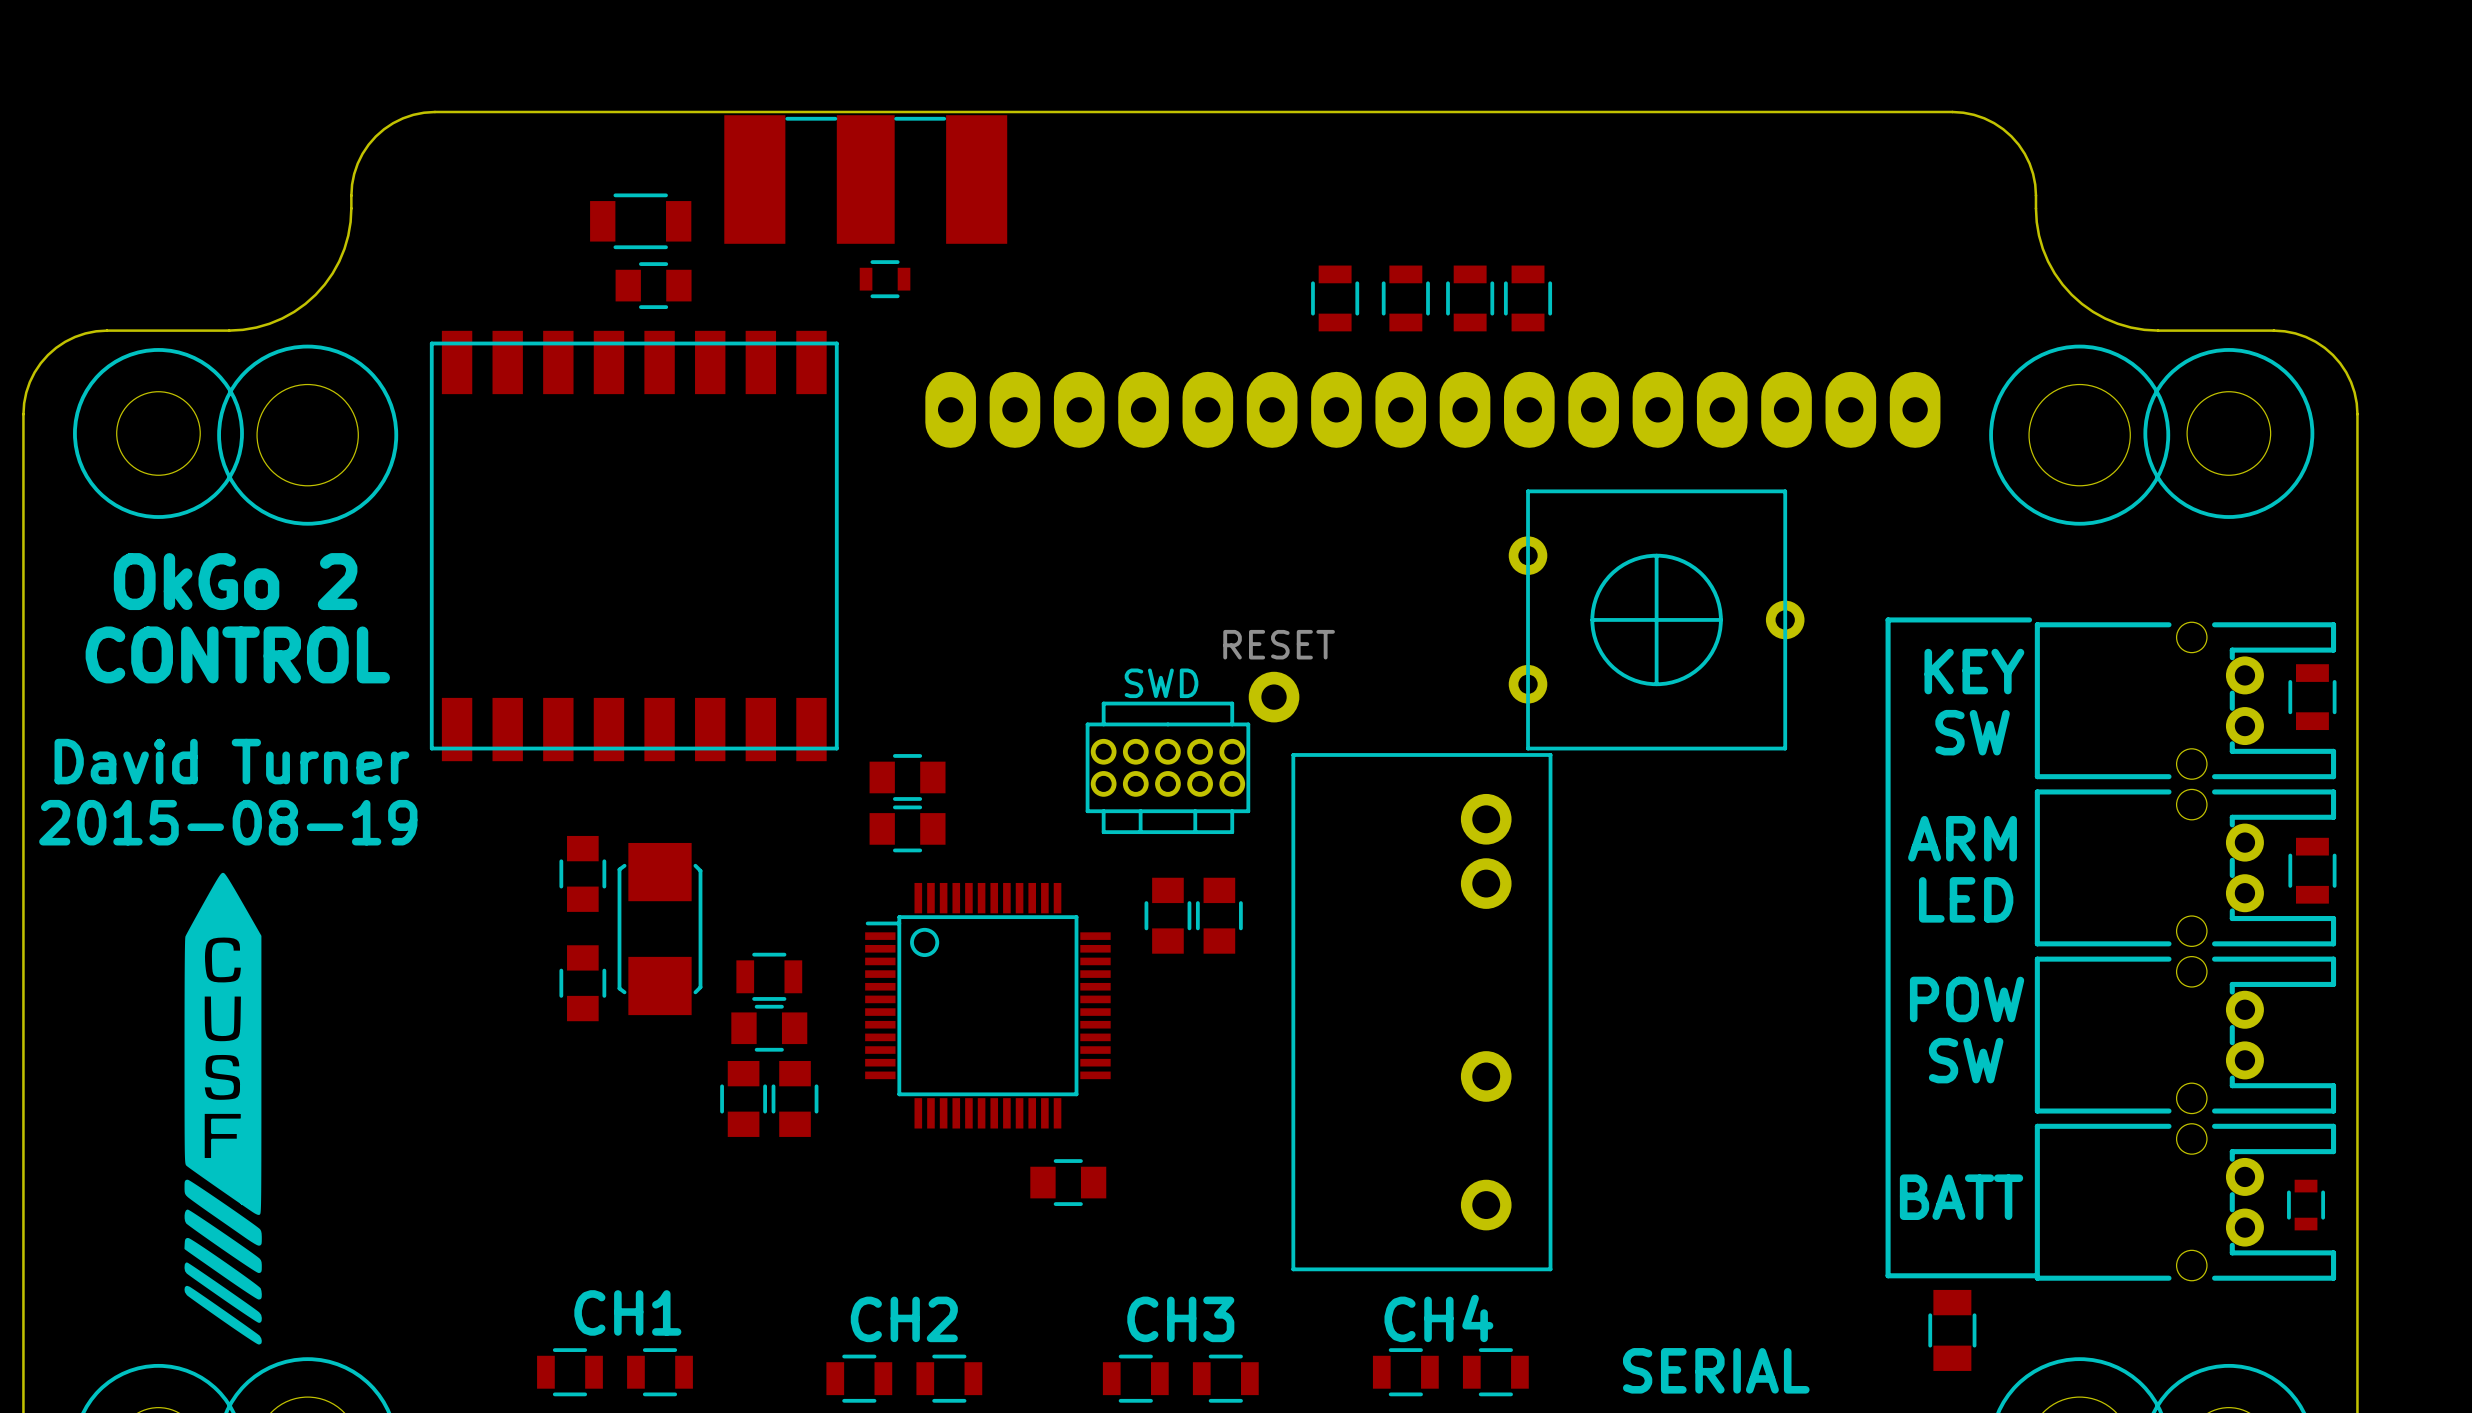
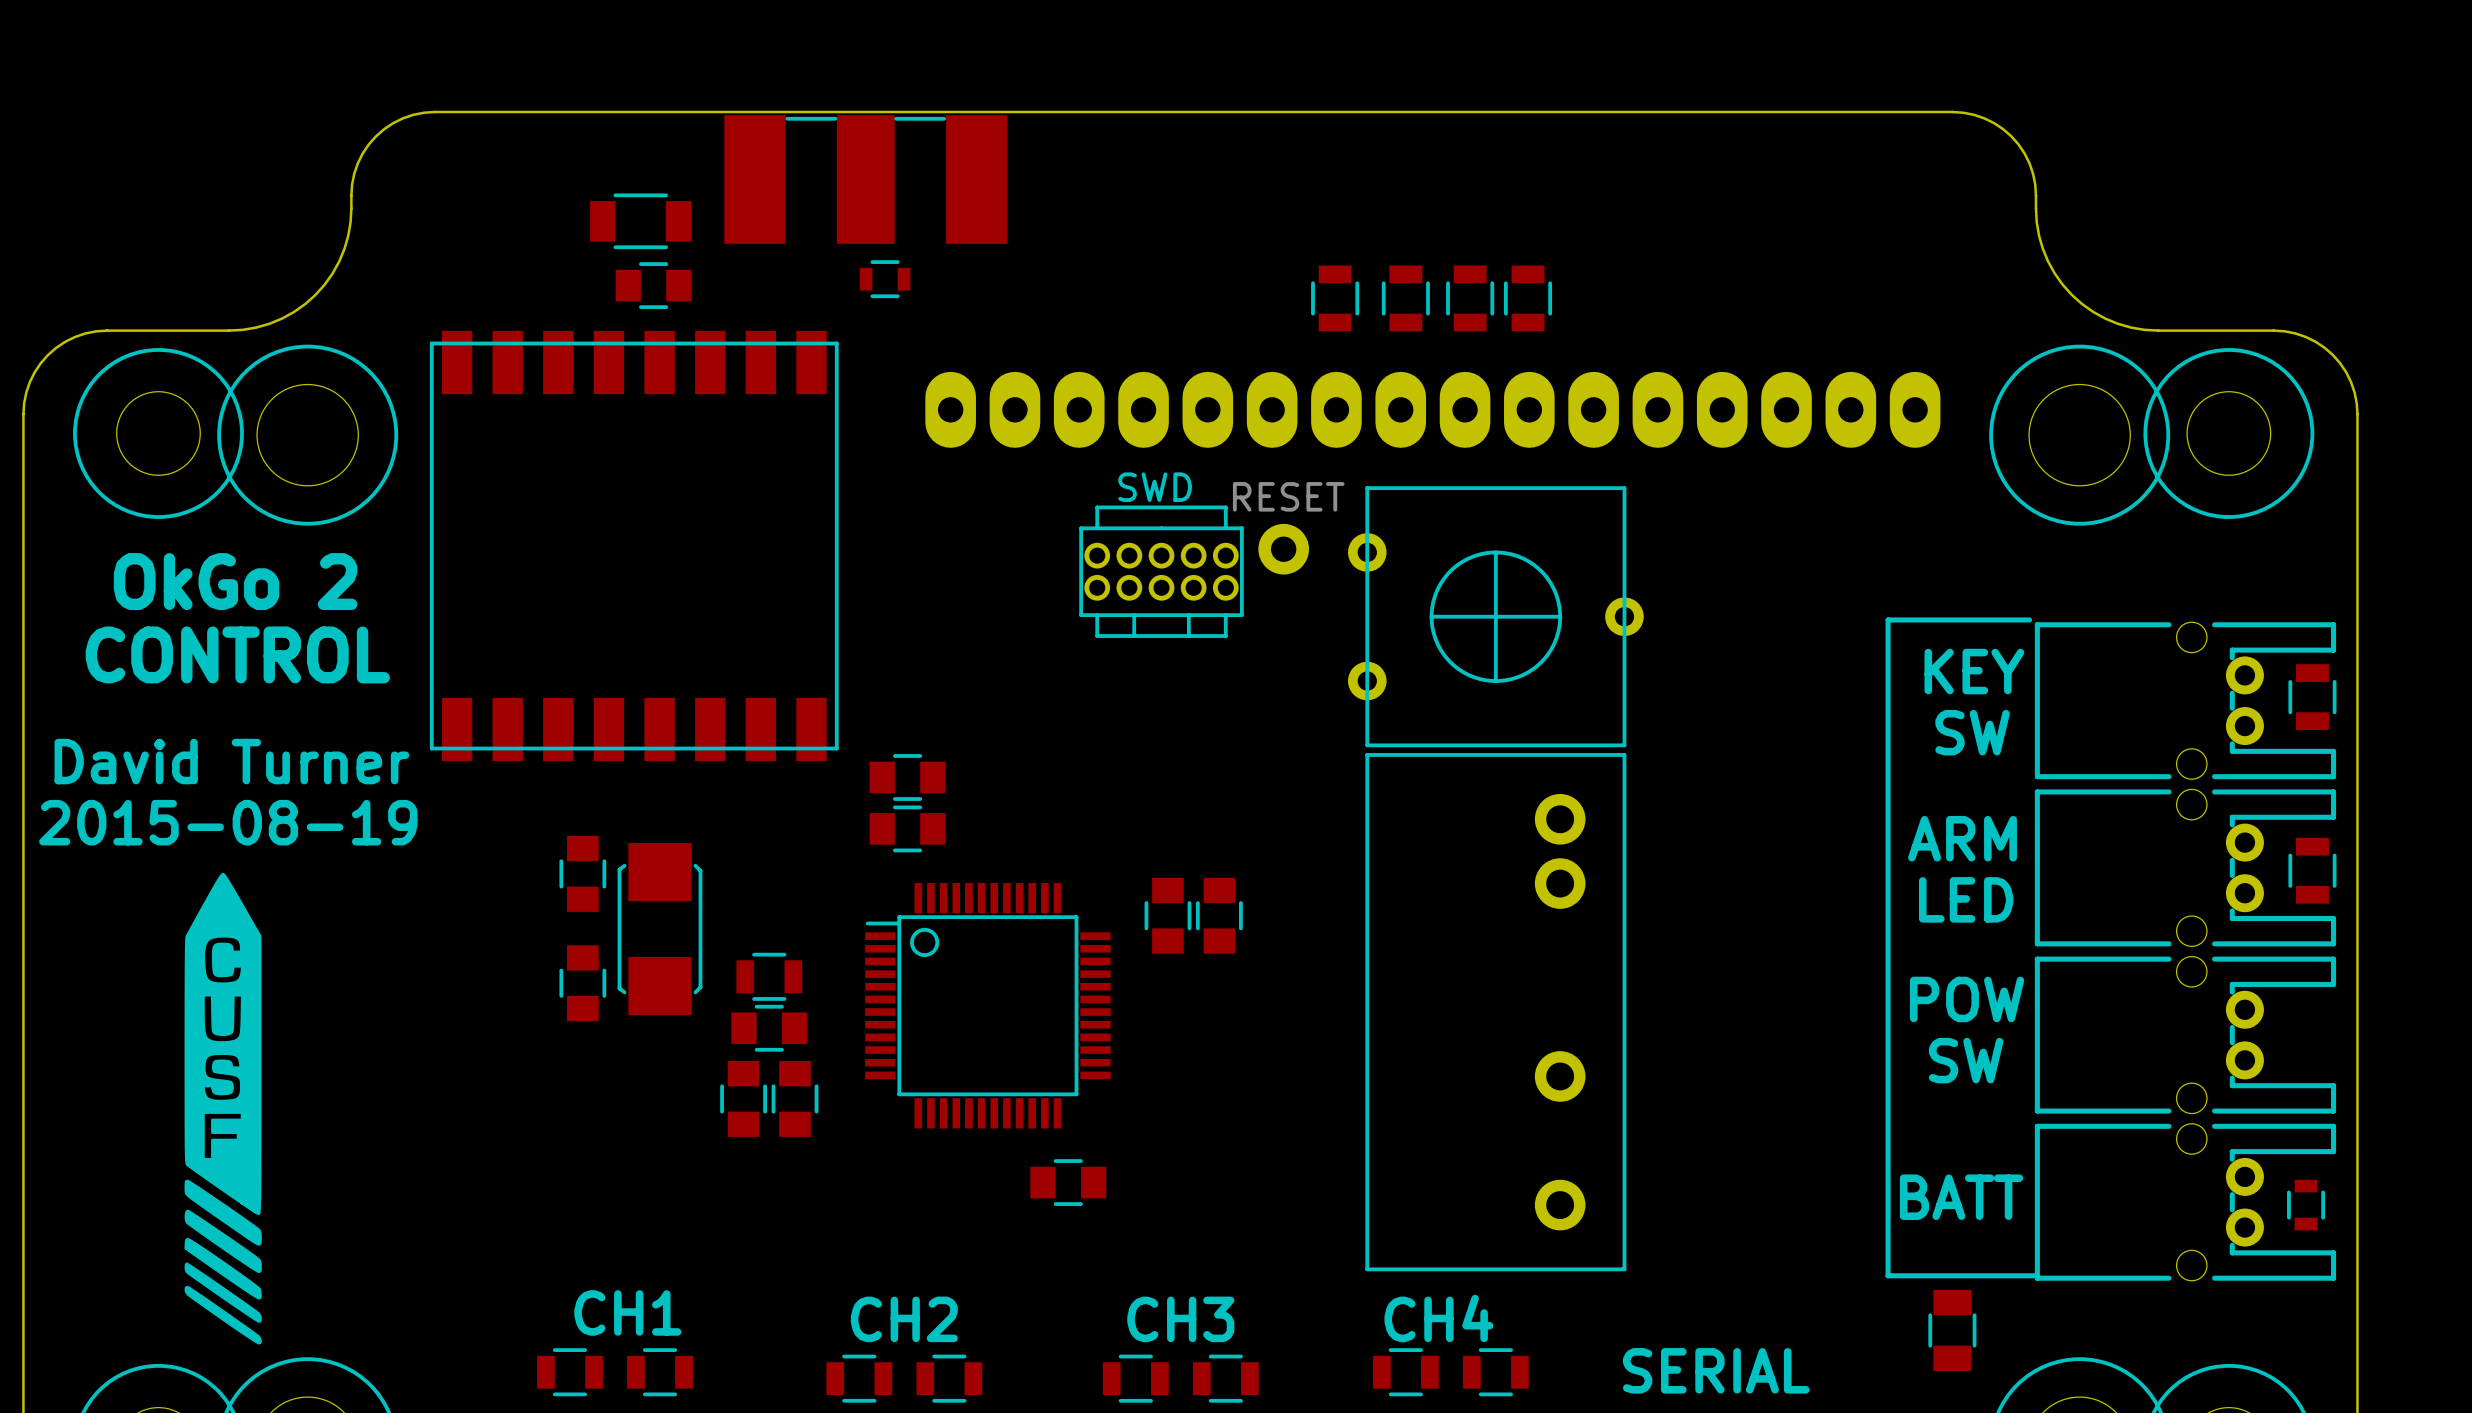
part position: (1656, 619) -> (1495, 616)
part position: (1274, 697) -> (1283, 549)
part position: (1167, 767) -> (1161, 571)
part position: (1421, 1012) -> (1495, 1012)

